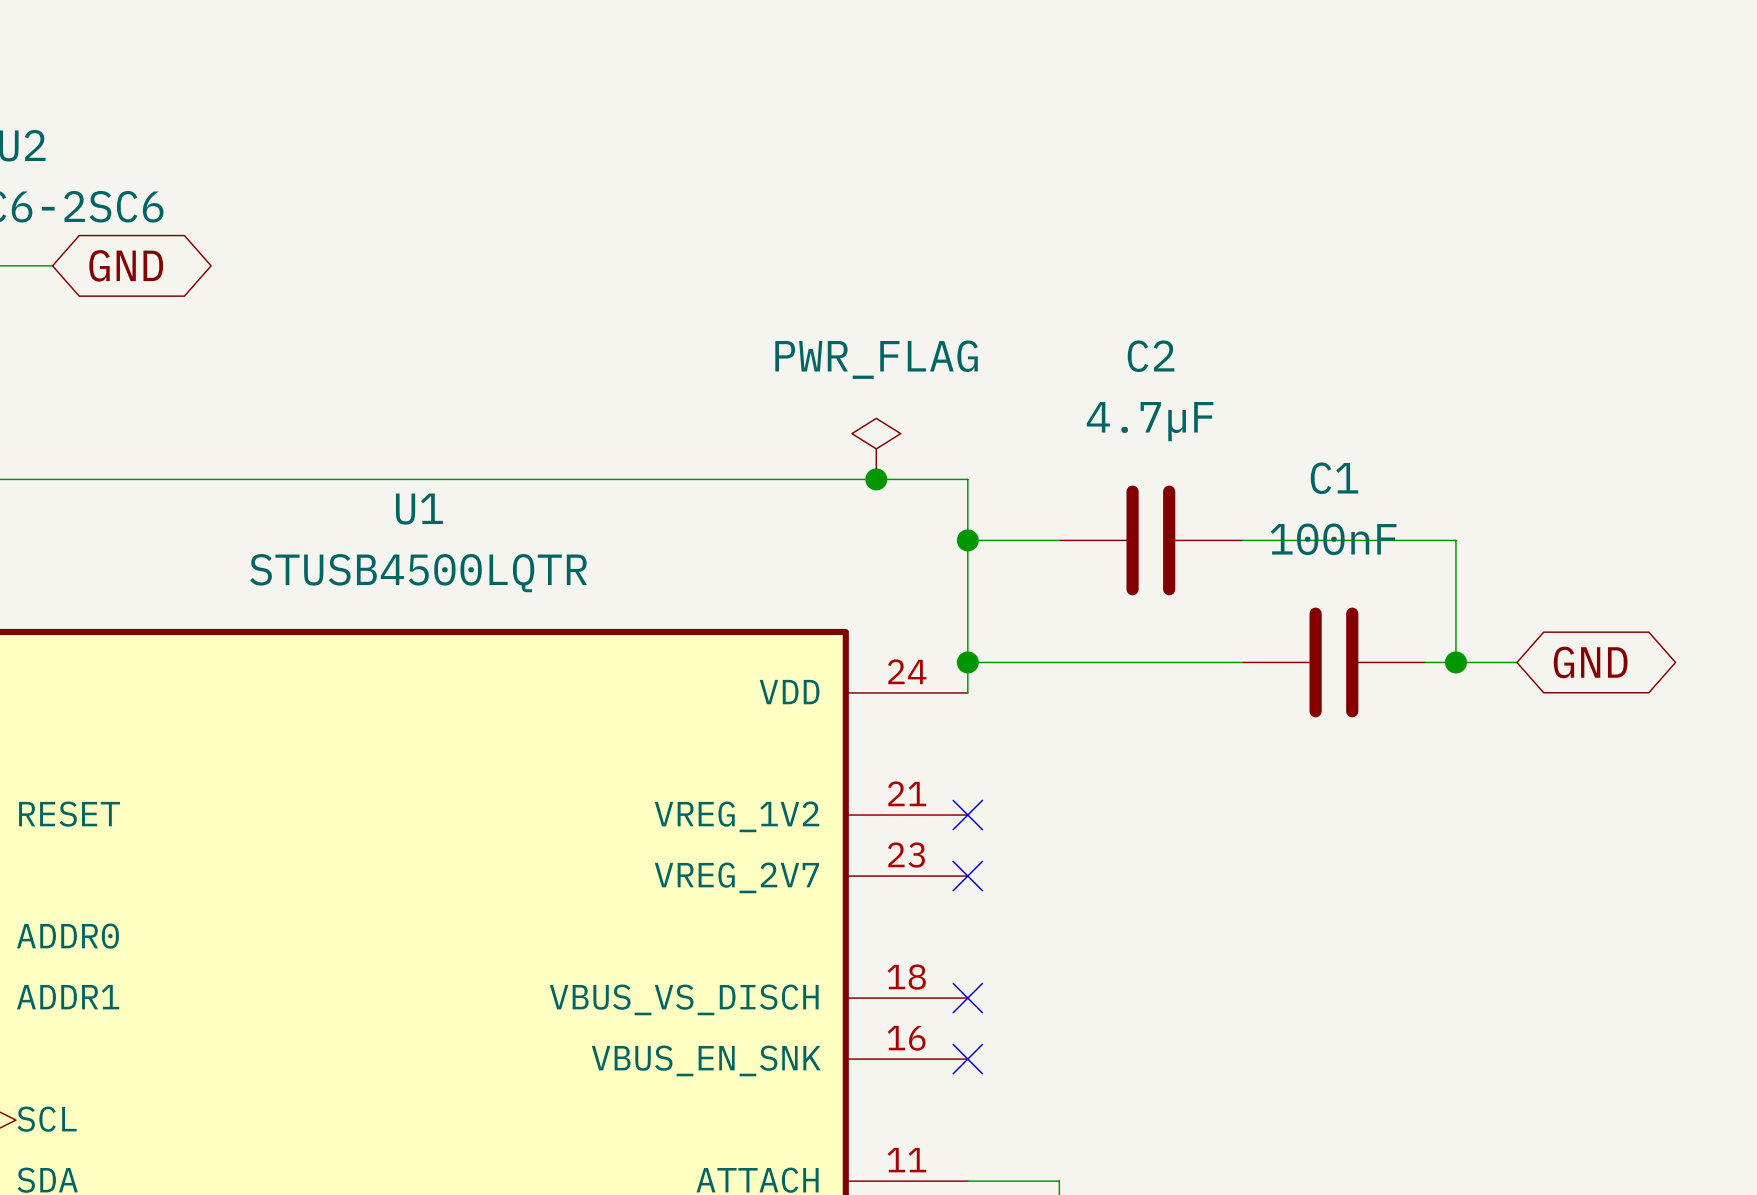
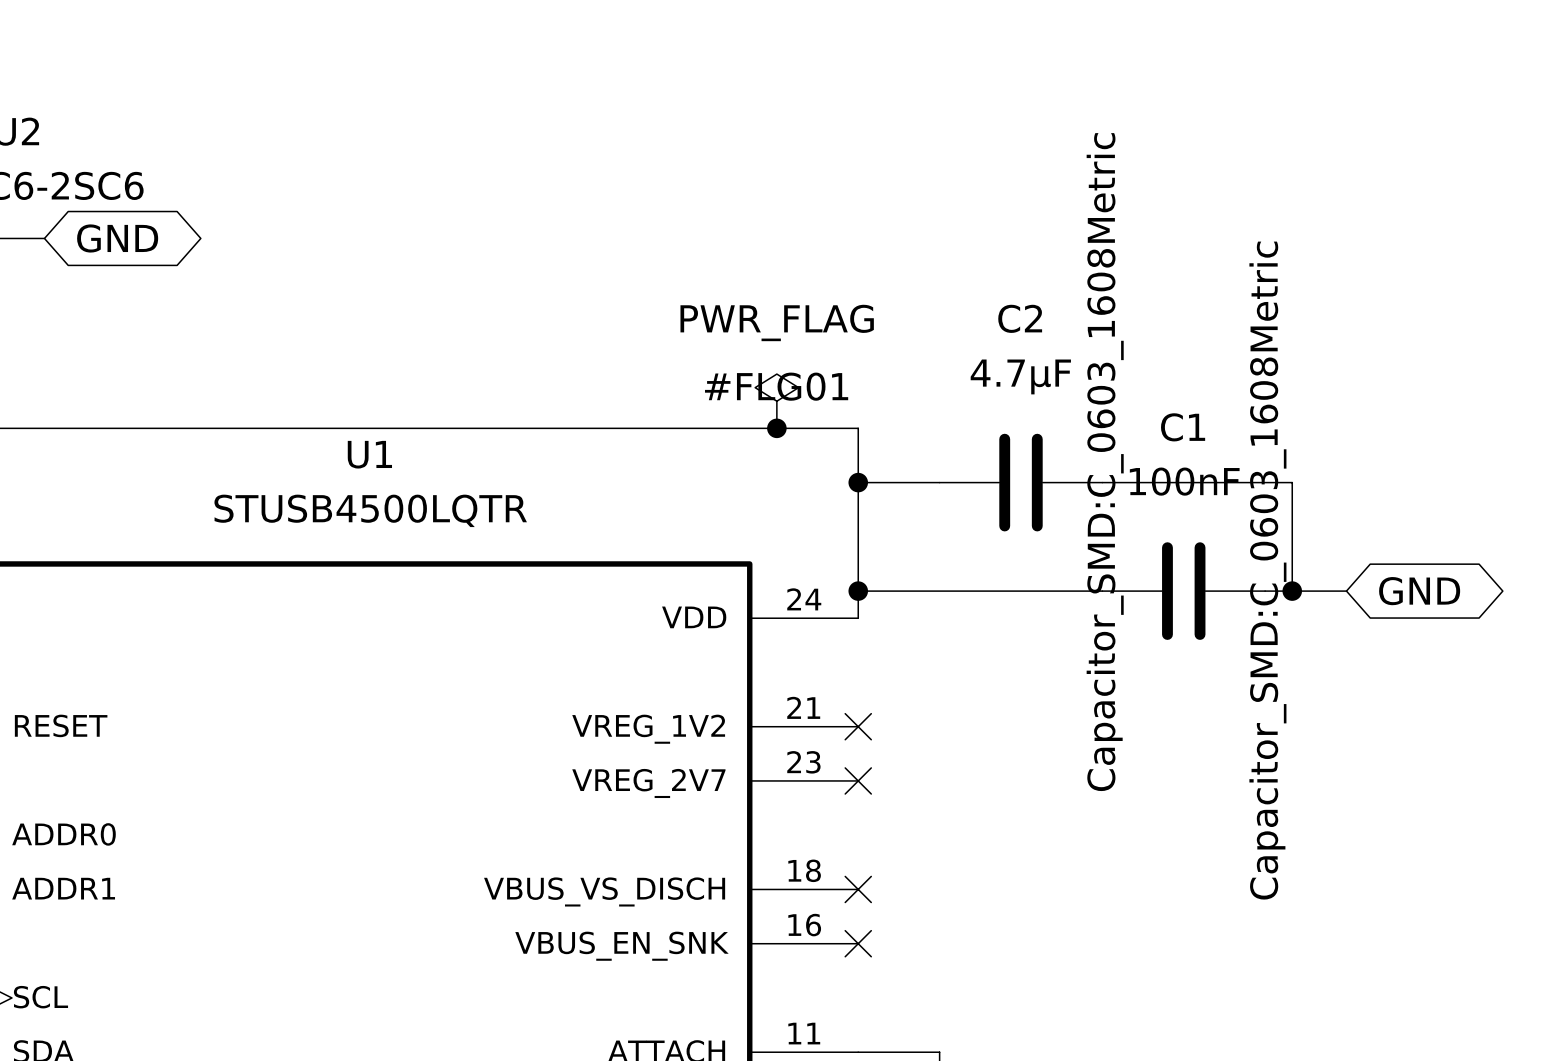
#FLG01 name: none -> #FLG01 (776, 386)
C2 text: none -> Capacitor_SMD:C_0603_1608Metric (1105, 462)
C1 text: none -> Capacitor_SMD:C_0603_1608Metric (1267, 570)

